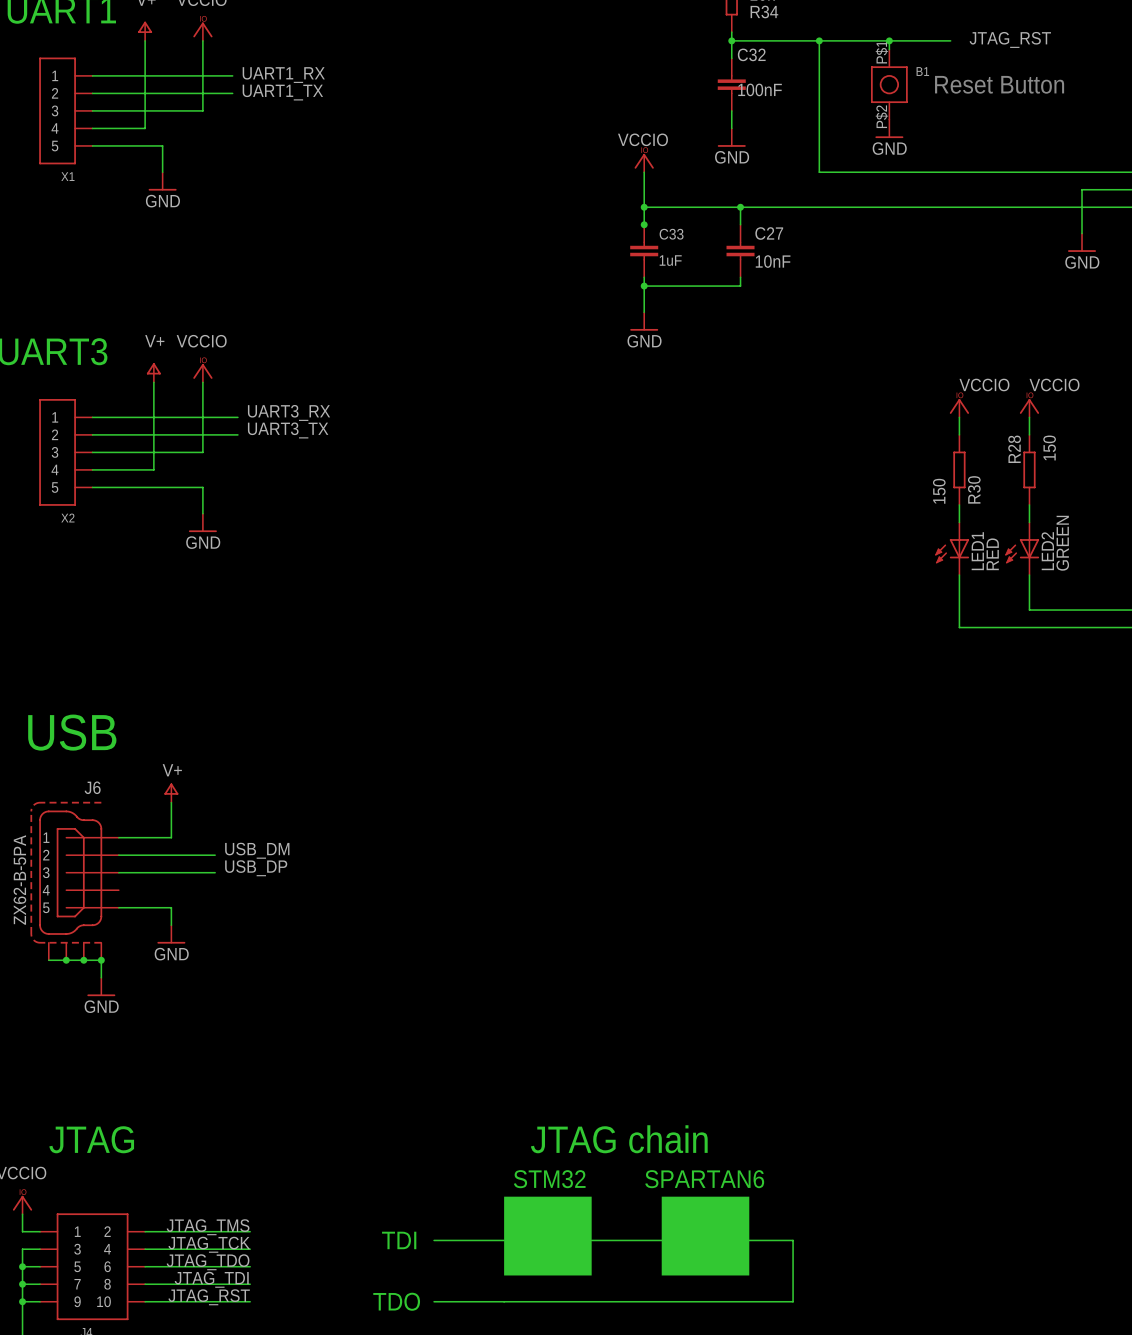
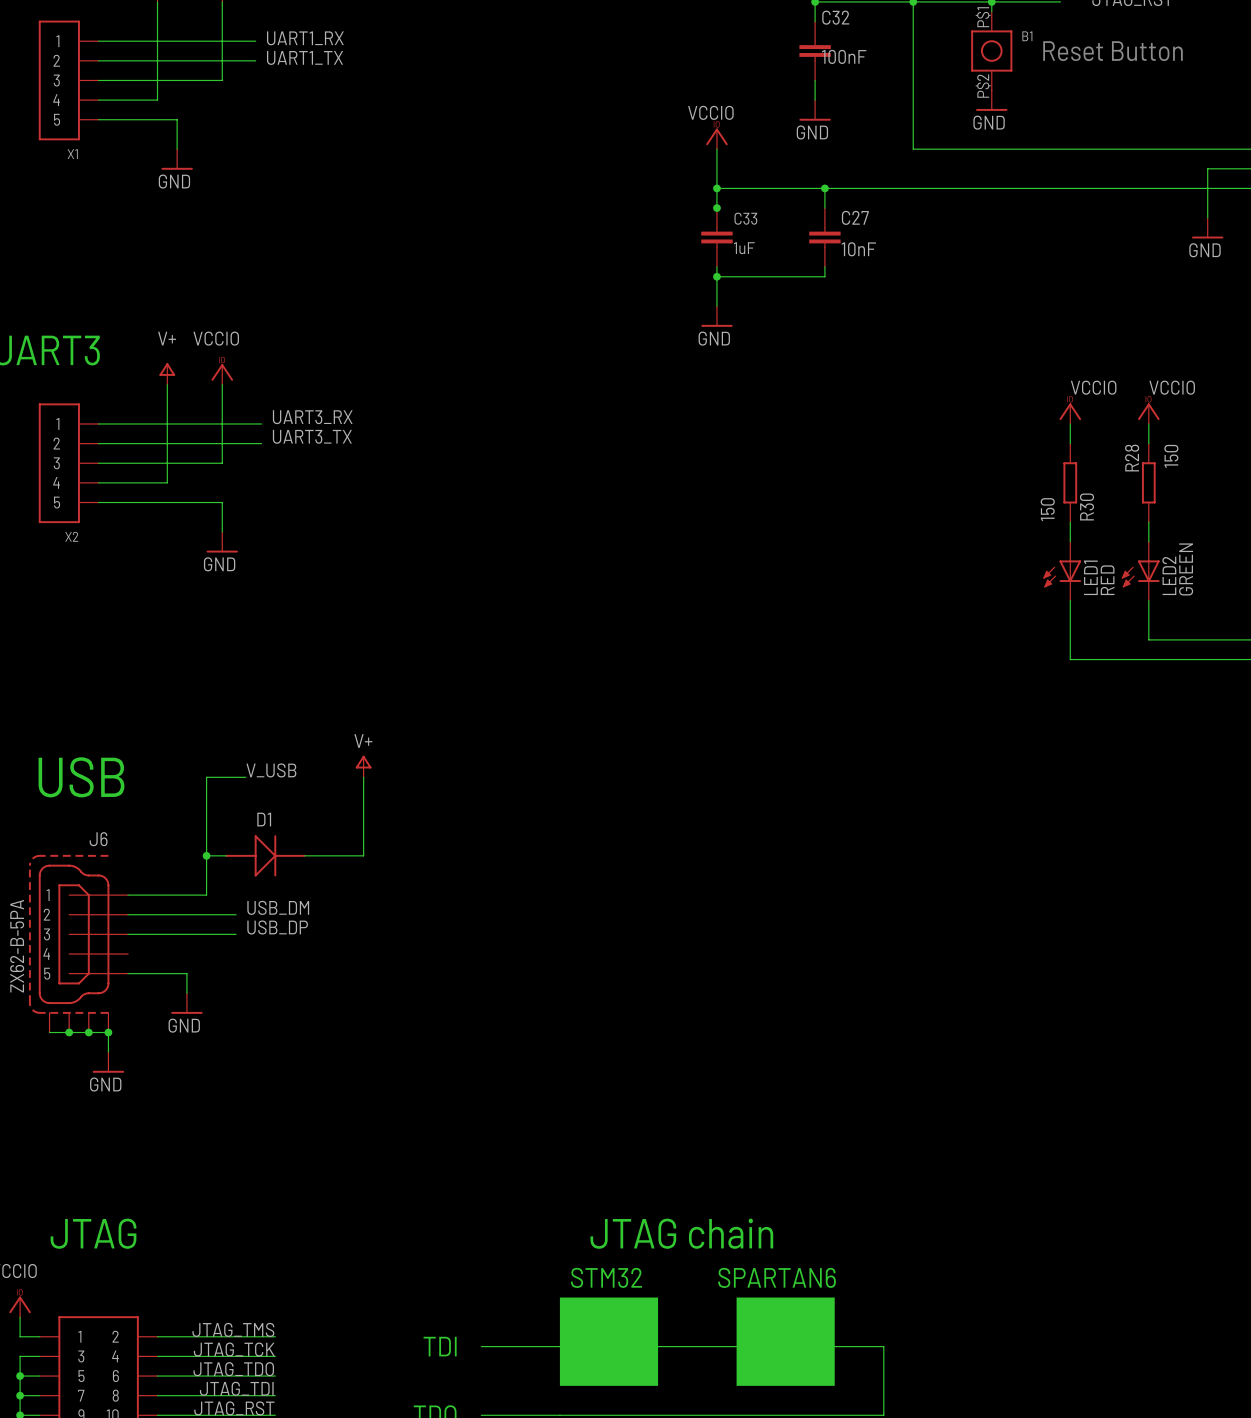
power symbol: none -> V+ (363, 766)
label: none -> V_USB (271, 770)
wire: none -> (363, 777) (363, 855) (304, 855)
power symbol: V+ (171, 793) -> none
wire: (171, 802) (171, 837) -> (245, 777) (206, 777) (206, 895) (186, 895)
wire: none -> (206, 855) (226, 855)
junction: none -> (206, 855)
D1: none -> (265, 855)

